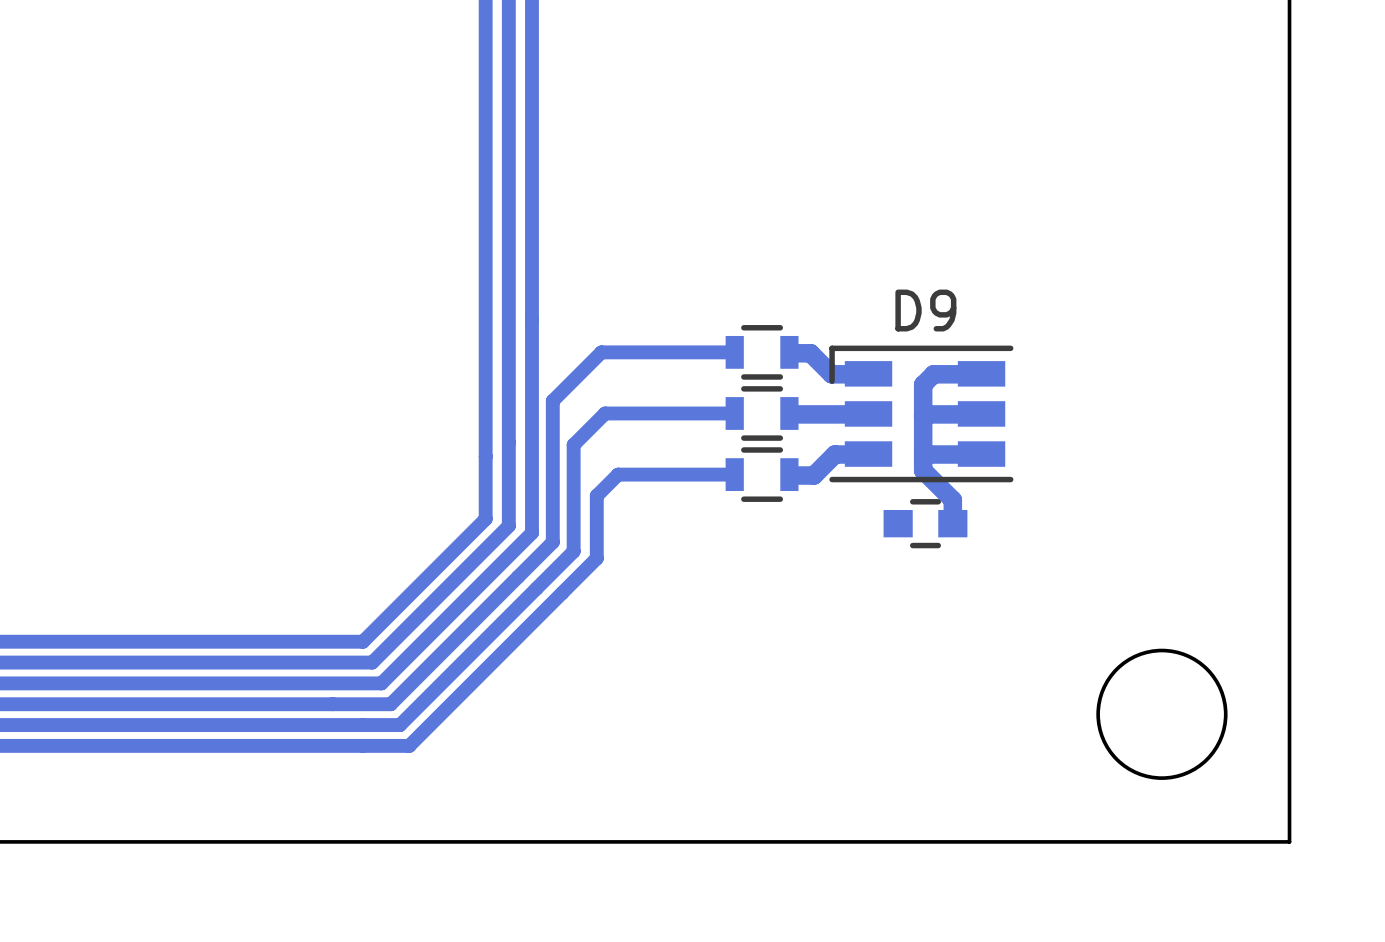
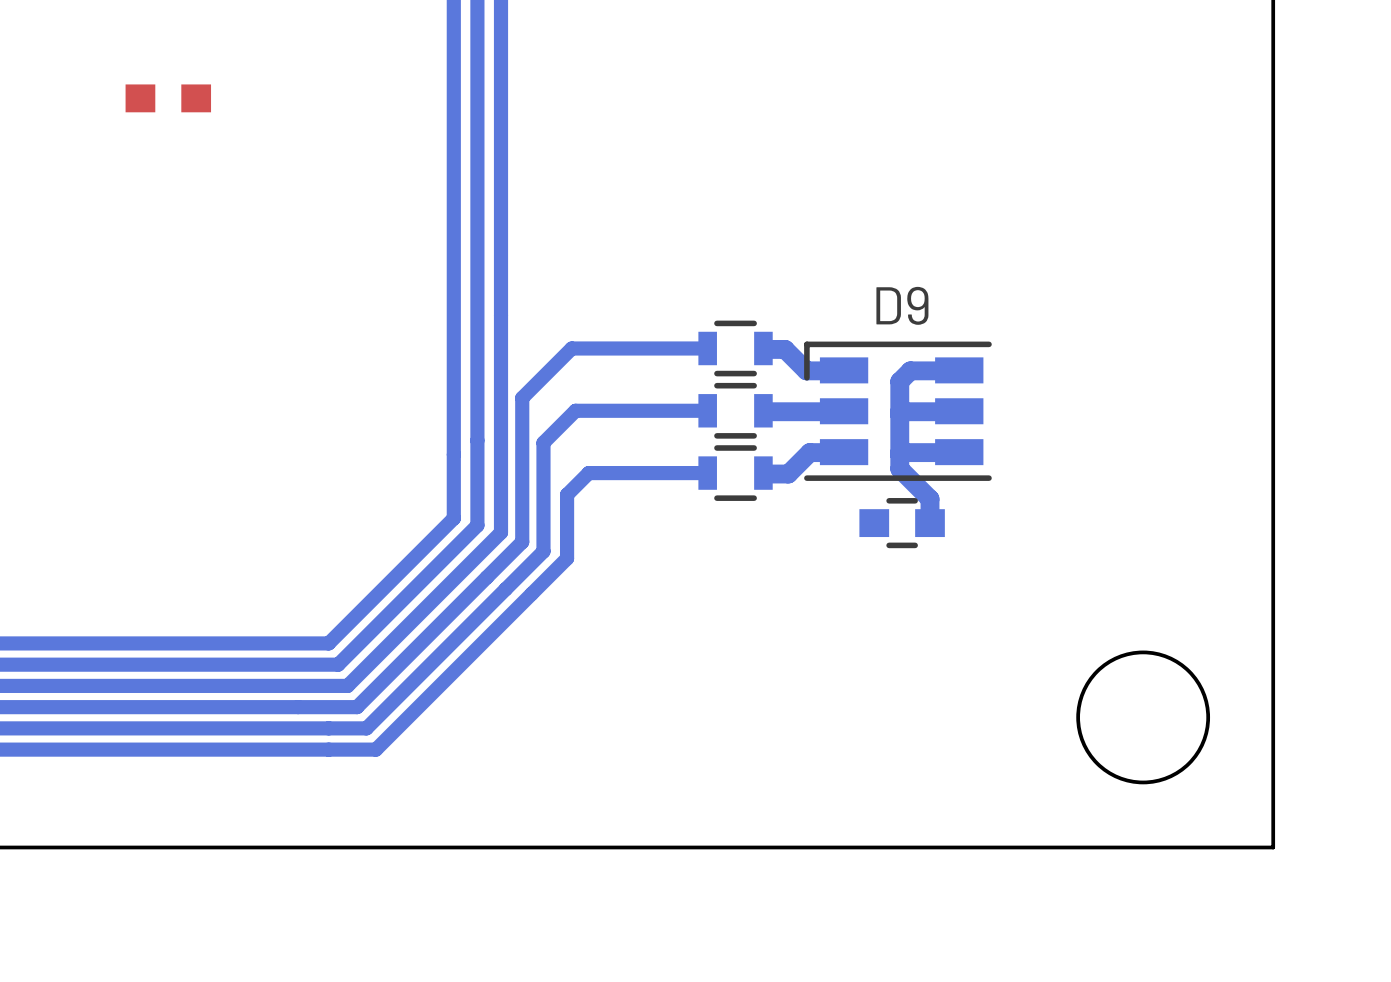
part: none -> (168, 98)

